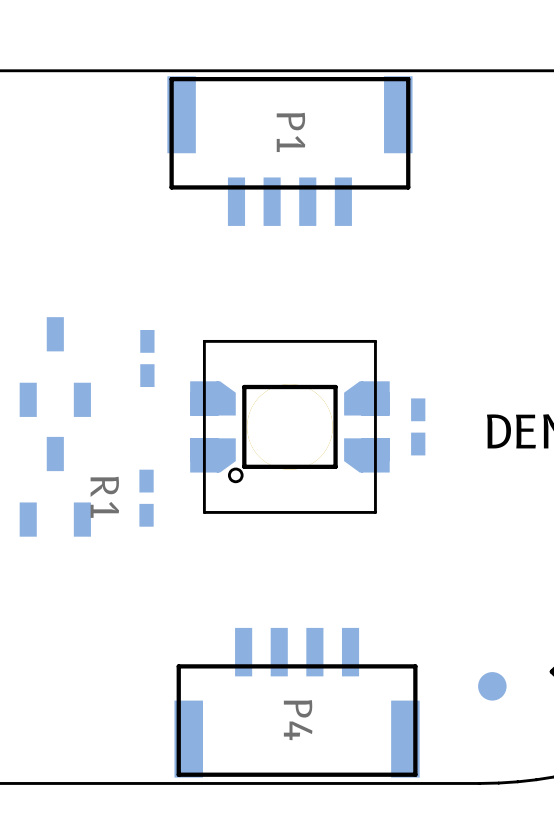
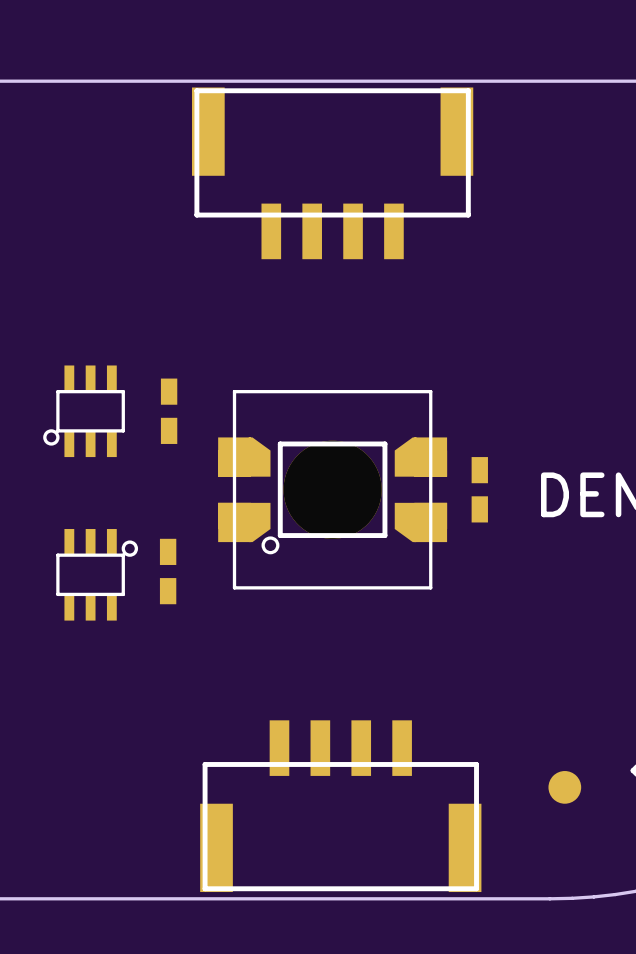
P1 name: P1 (291, 132) -> none
part footprint: [19, 317, 91, 417] -> [43, 365, 125, 458]
part: (55, 486) -> none
R1 name: R1 (104, 497) -> none
part: none -> (97, 574)
P4 name: P4 (298, 720) -> none

